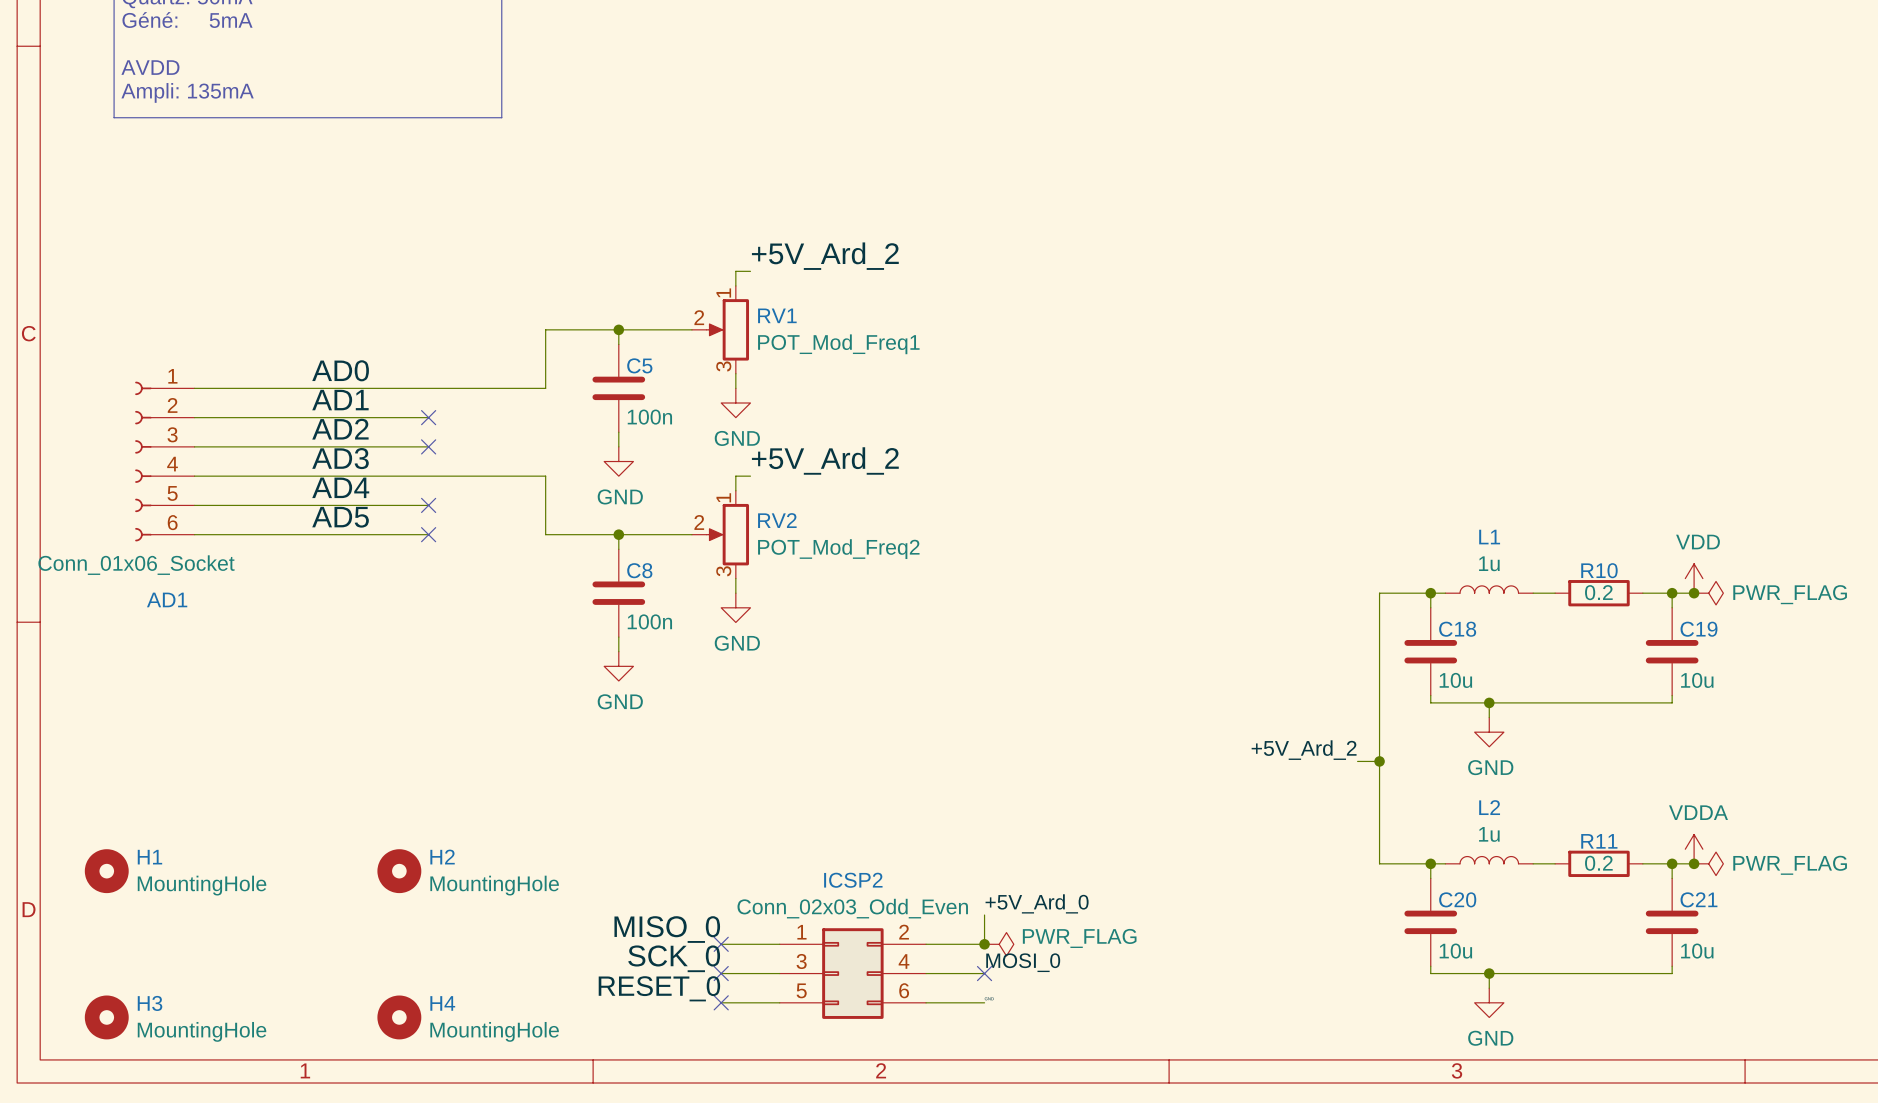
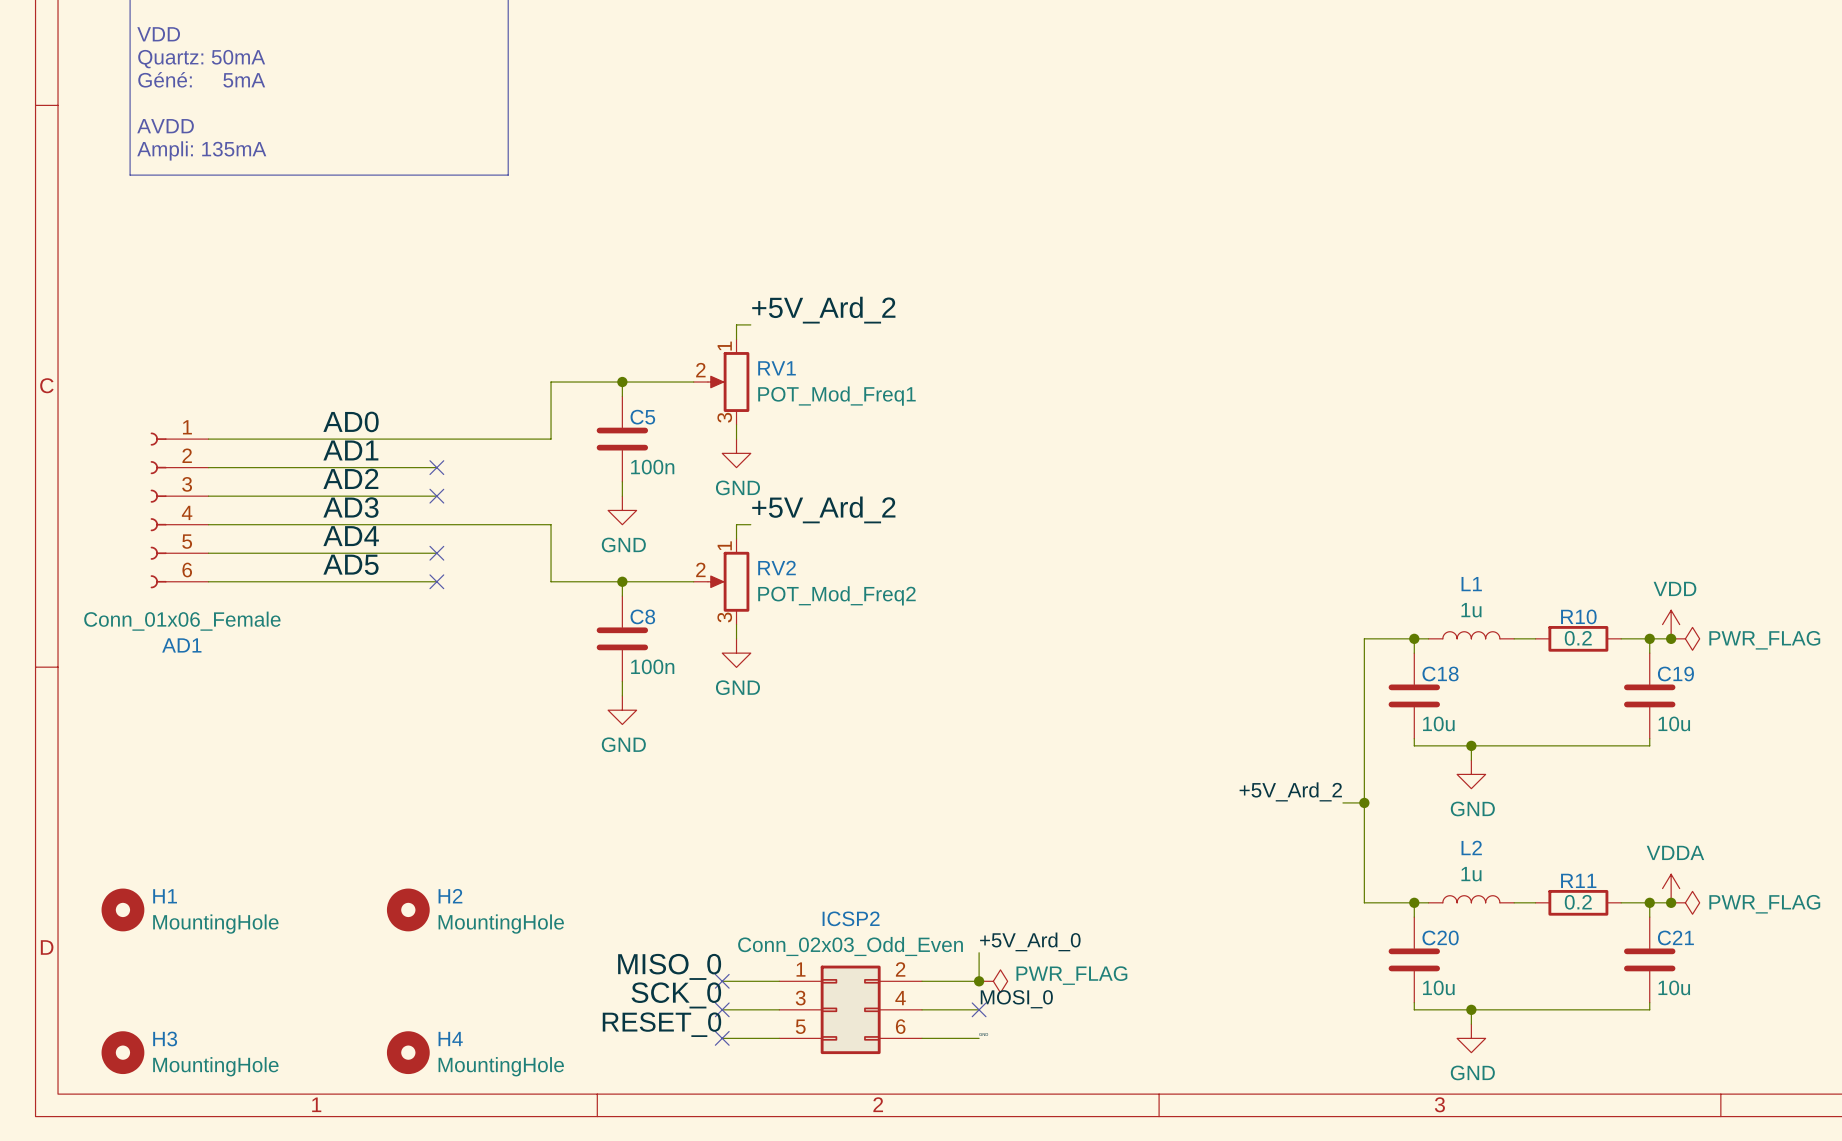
AD1 value: Conn_01x06_Socket (136, 565) -> Conn_01x06_Female (182, 621)

